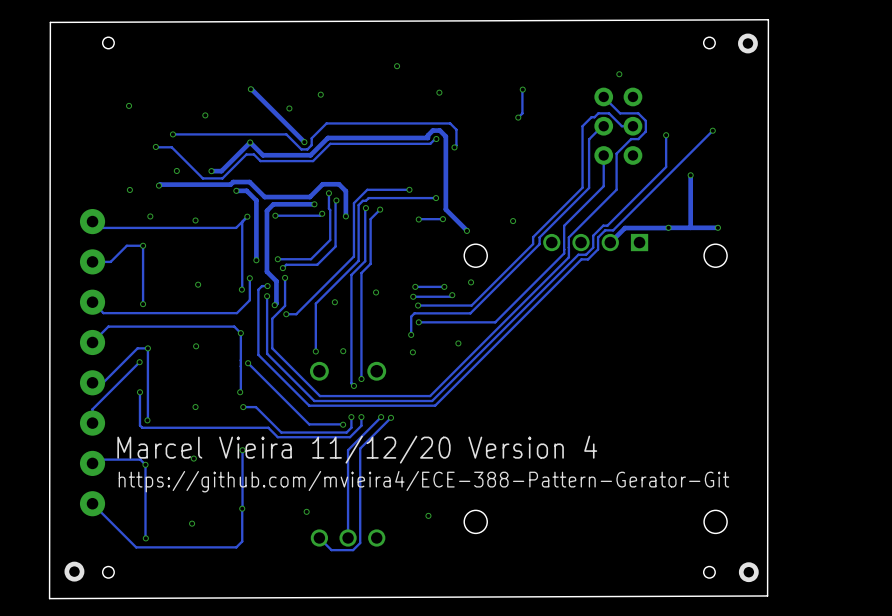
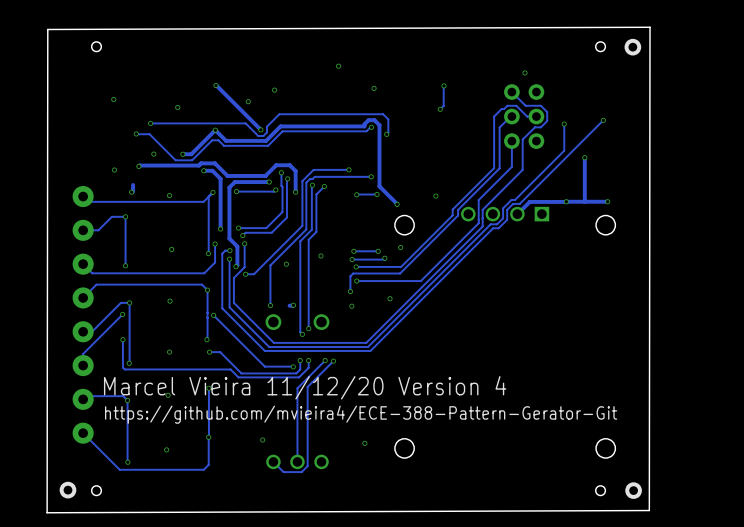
track: none -> (133, 184) (133, 192)
track: none -> (293, 305) (289, 305)

